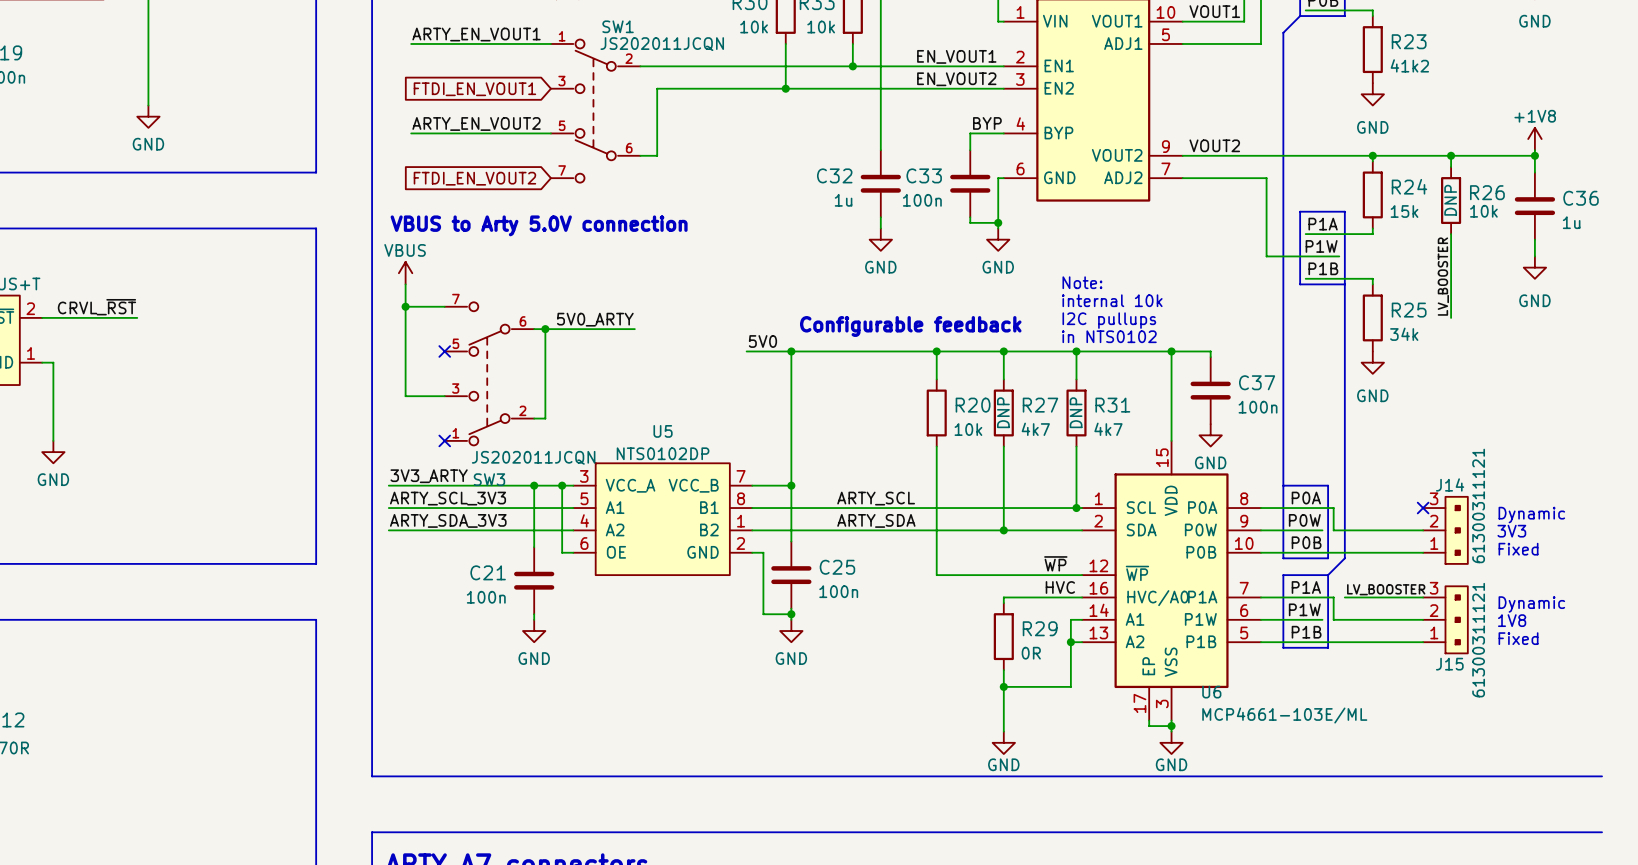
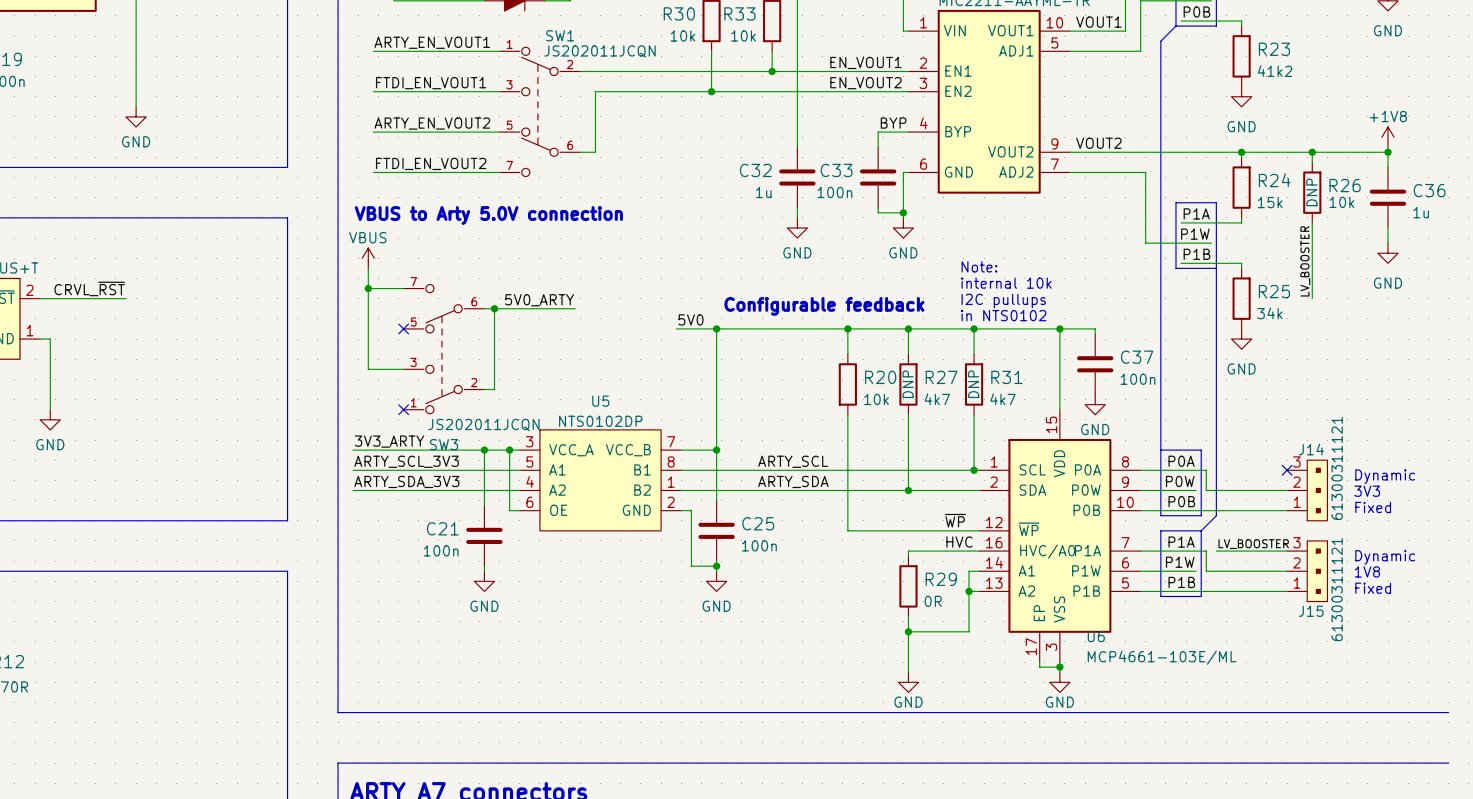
label: none -> FTDI_EN_VOUT1 (431, 83)
wire: none -> (373, 91) (499, 91)
global label: FTDI_EN_VOUT1 (474, 89) -> none
label: none -> FTDI_EN_VOUT2 (431, 163)
wire: none -> (373, 172) (499, 172)
global label: FTDI_EN_VOUT2 (474, 178) -> none

